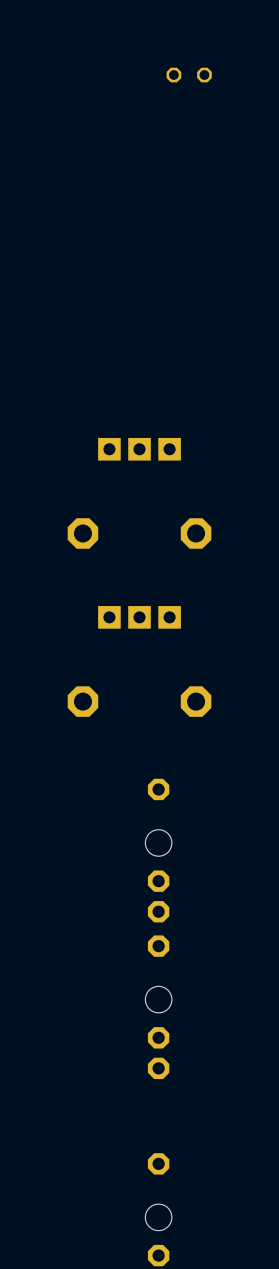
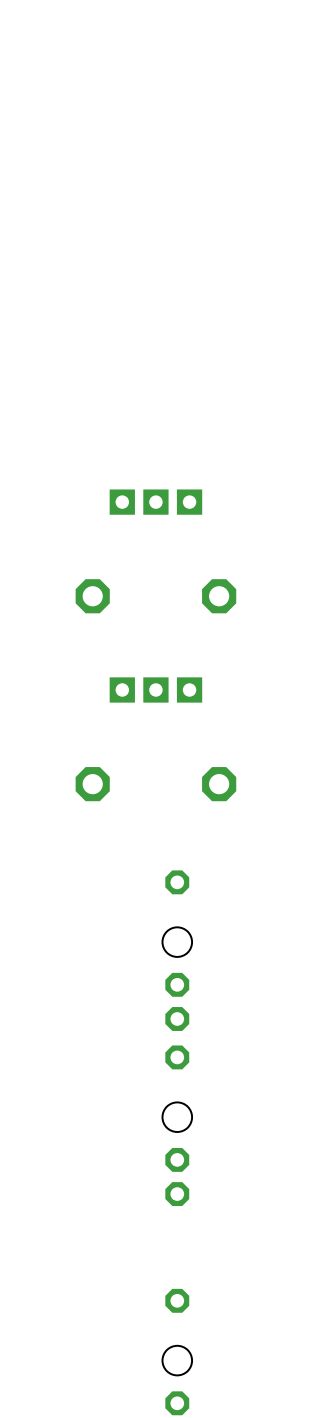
part: (189, 75) -> none

